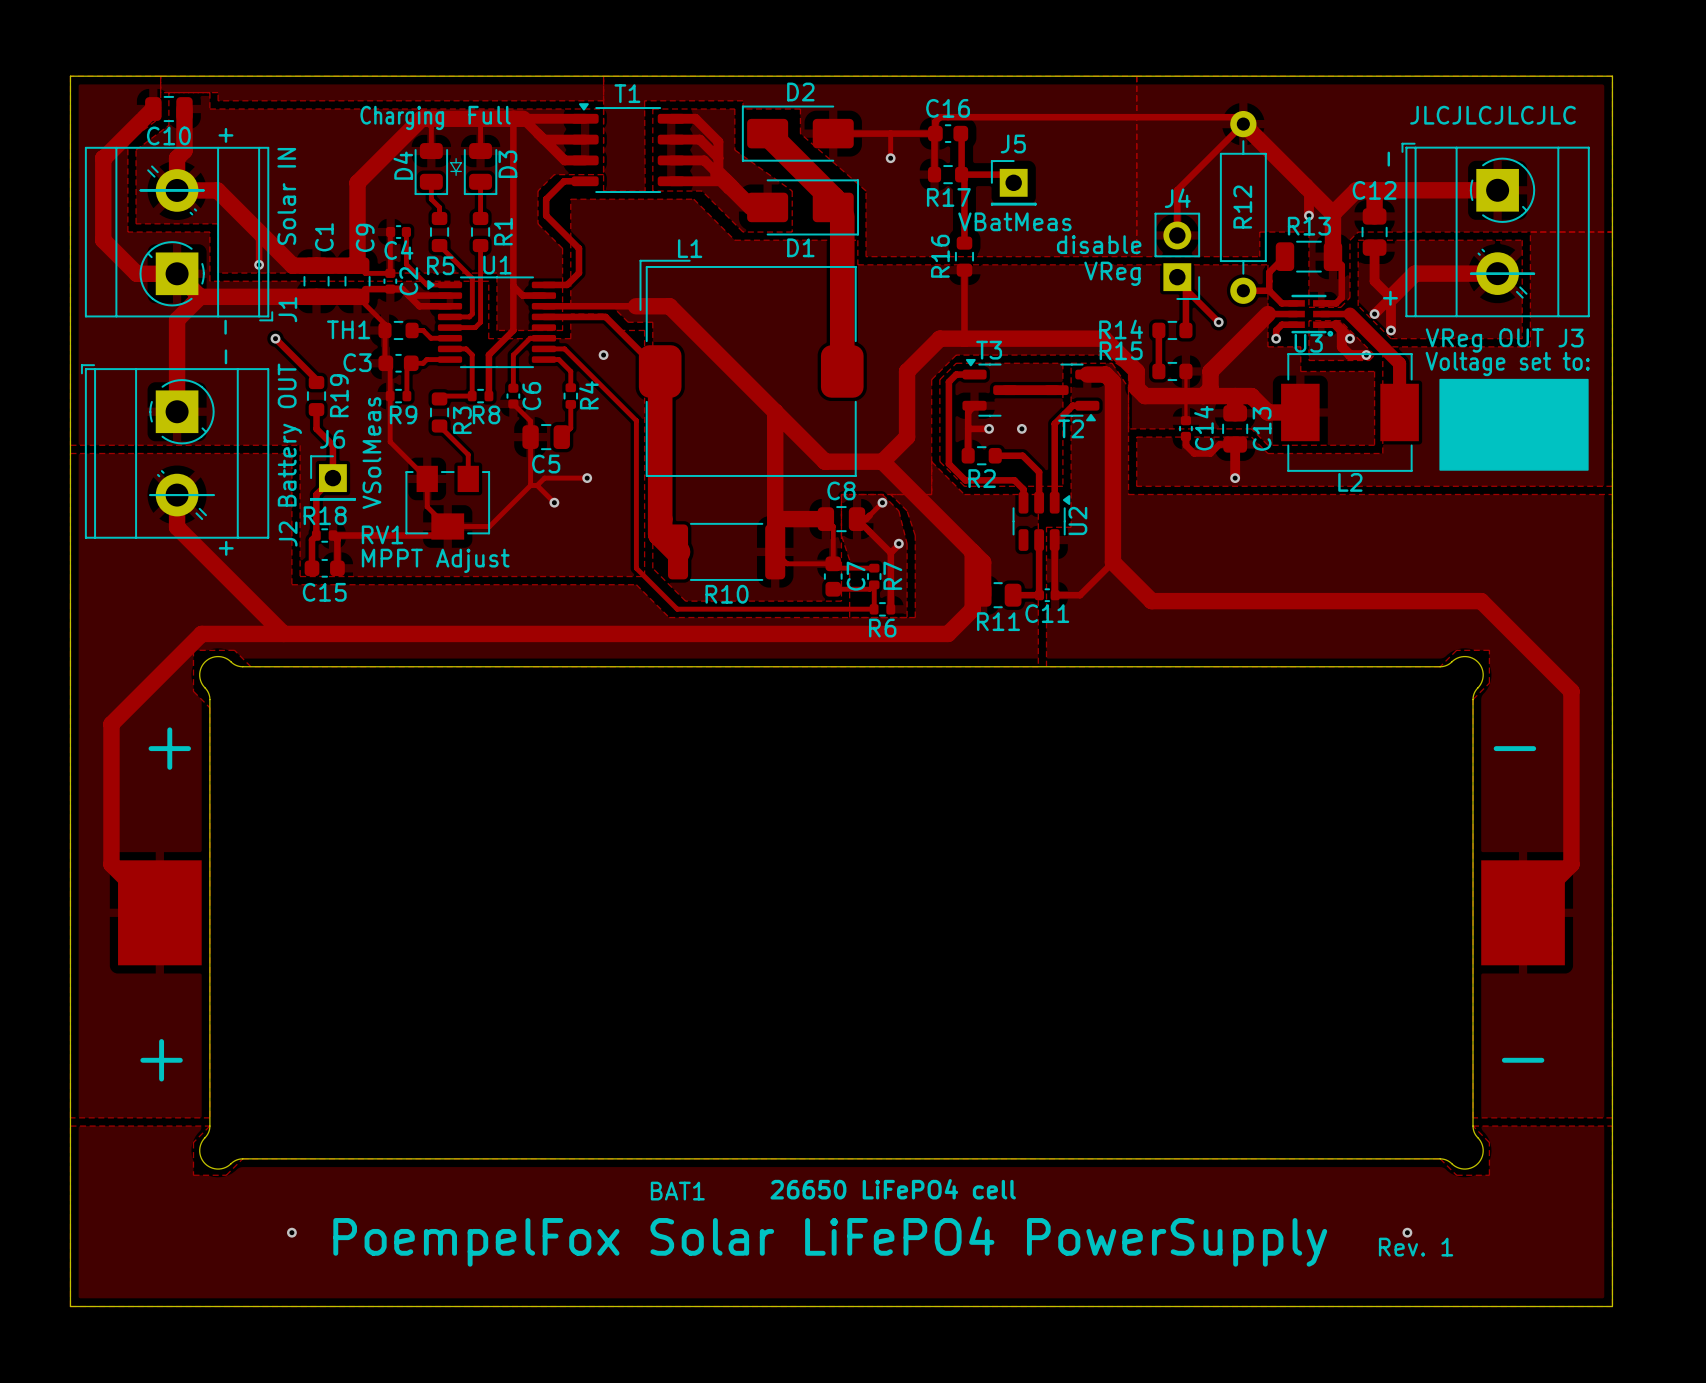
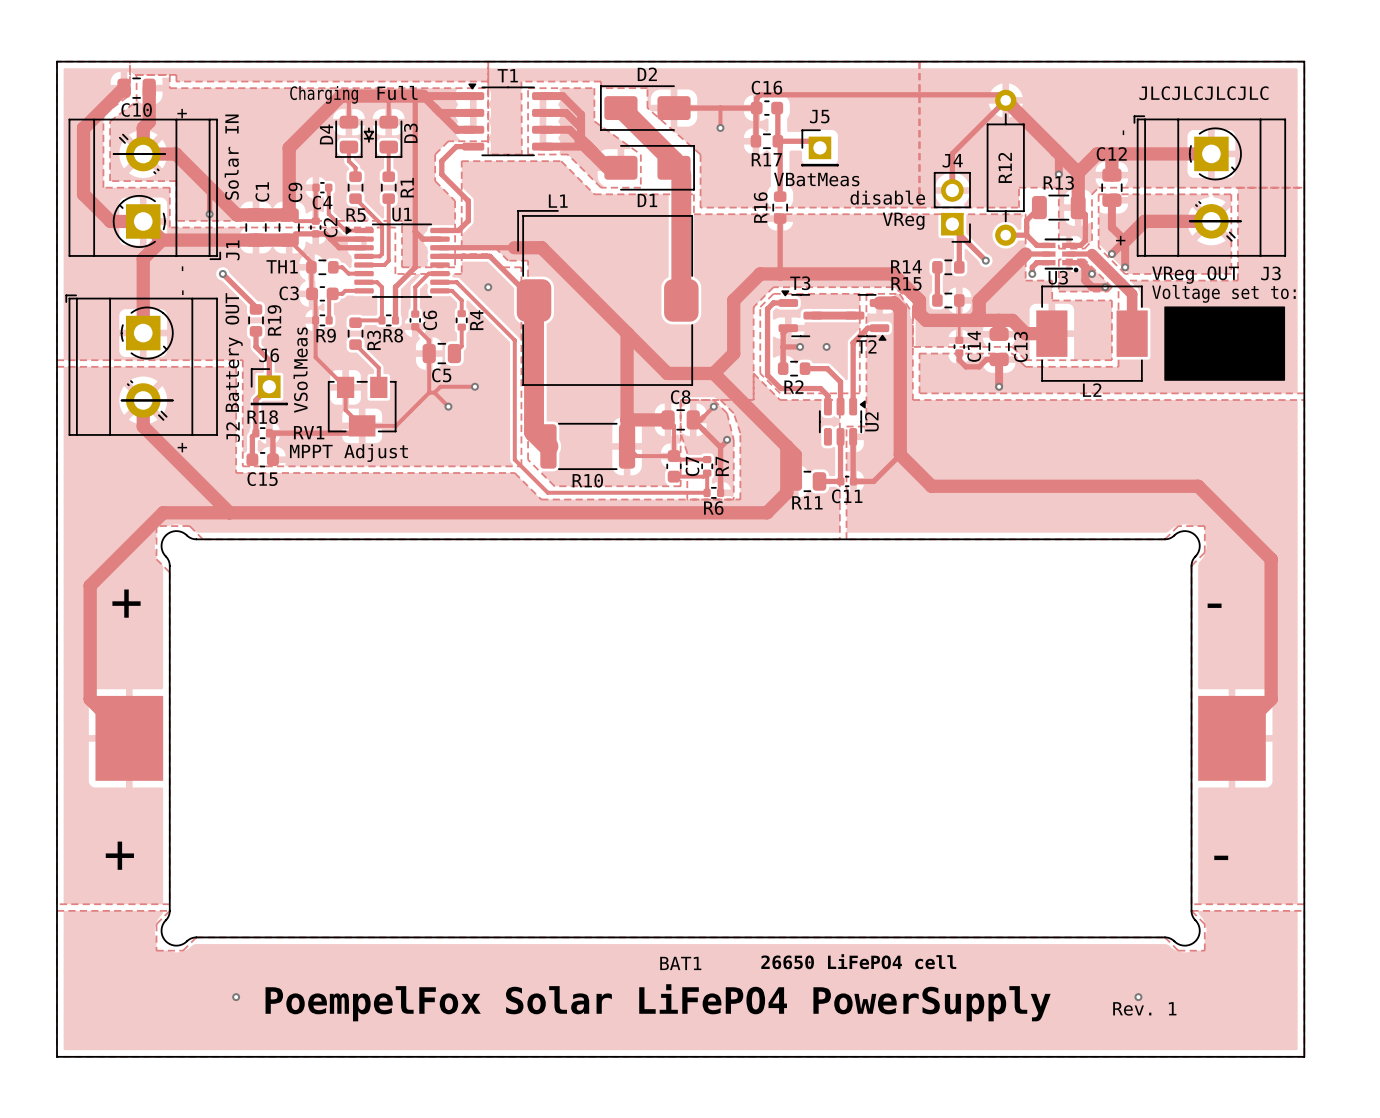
text position: 26650 LiFePO4 cell (893, 1189) -> 26650 LiFePO4 cell (858, 961)
BAT1 name position: BAT1 (677, 1191) -> BAT1 (680, 963)

